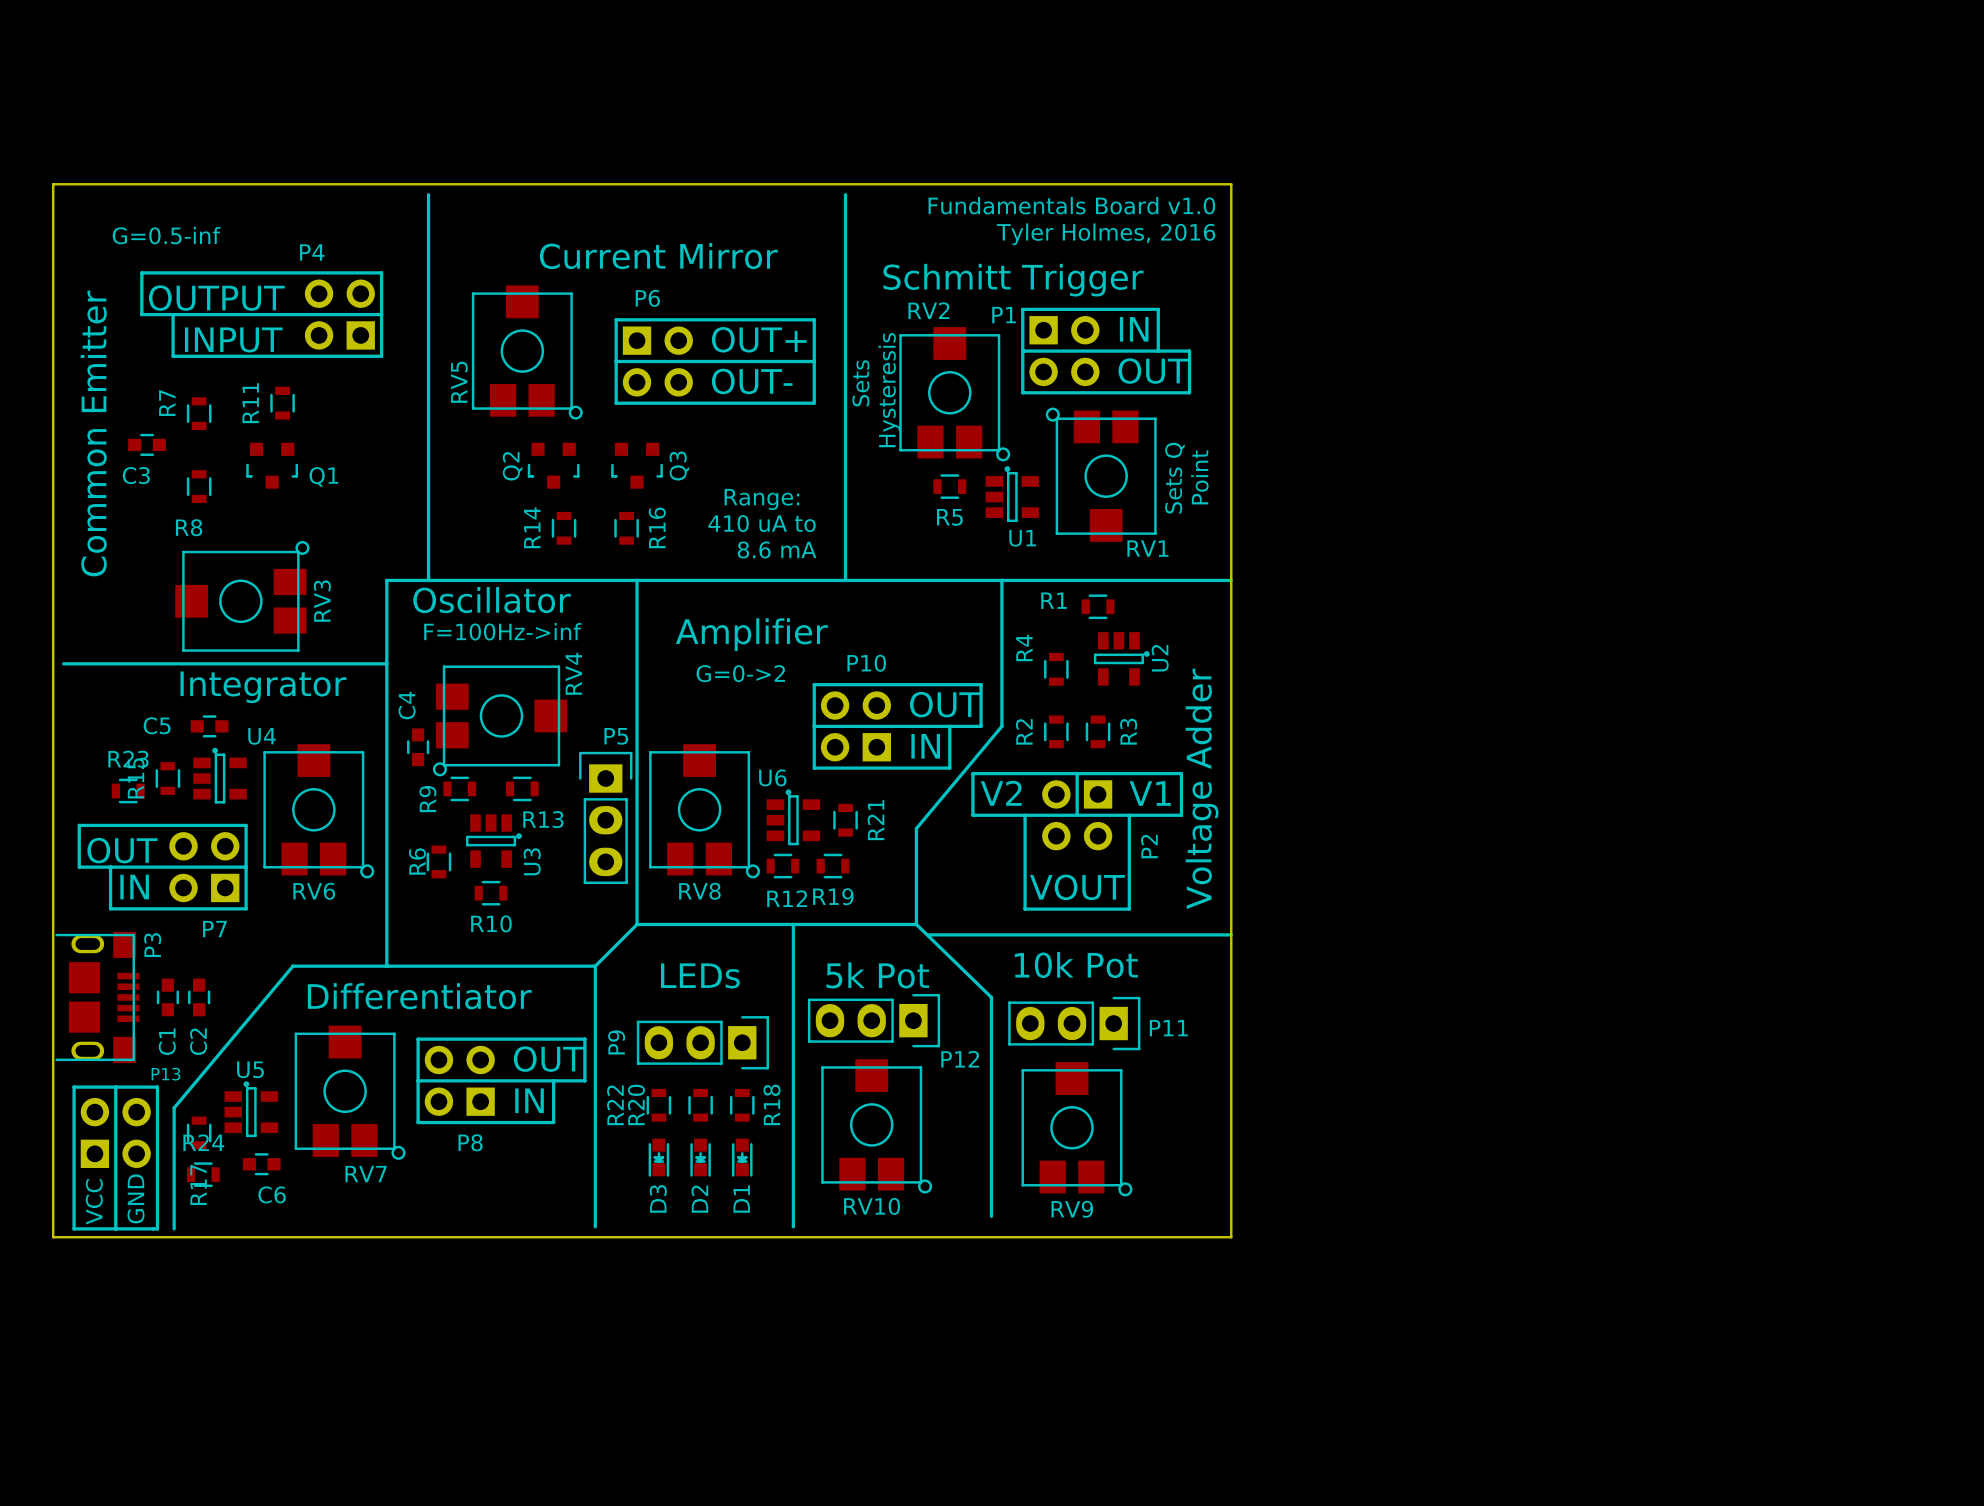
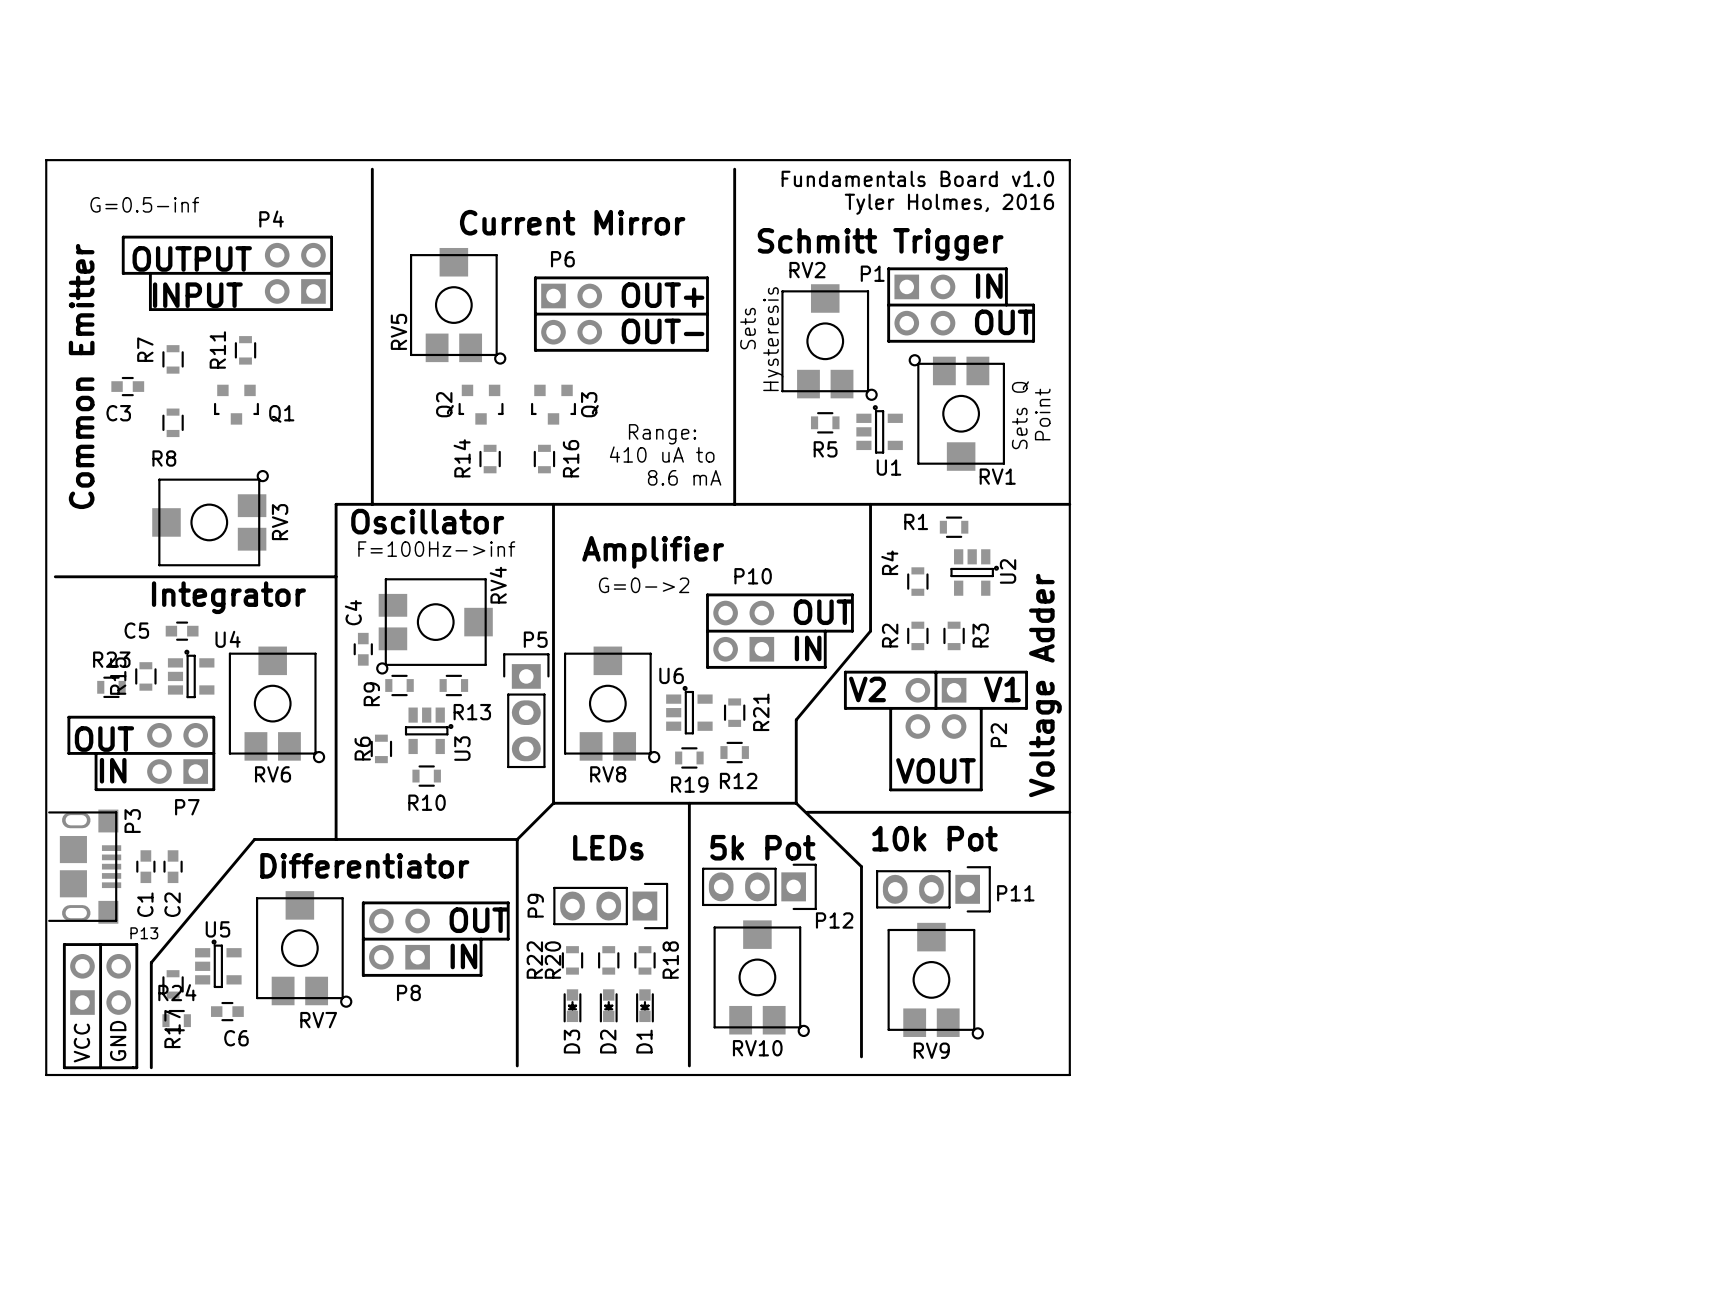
R12 position: (782, 866) -> (734, 752)
R19 position: (833, 866) -> (689, 757)

